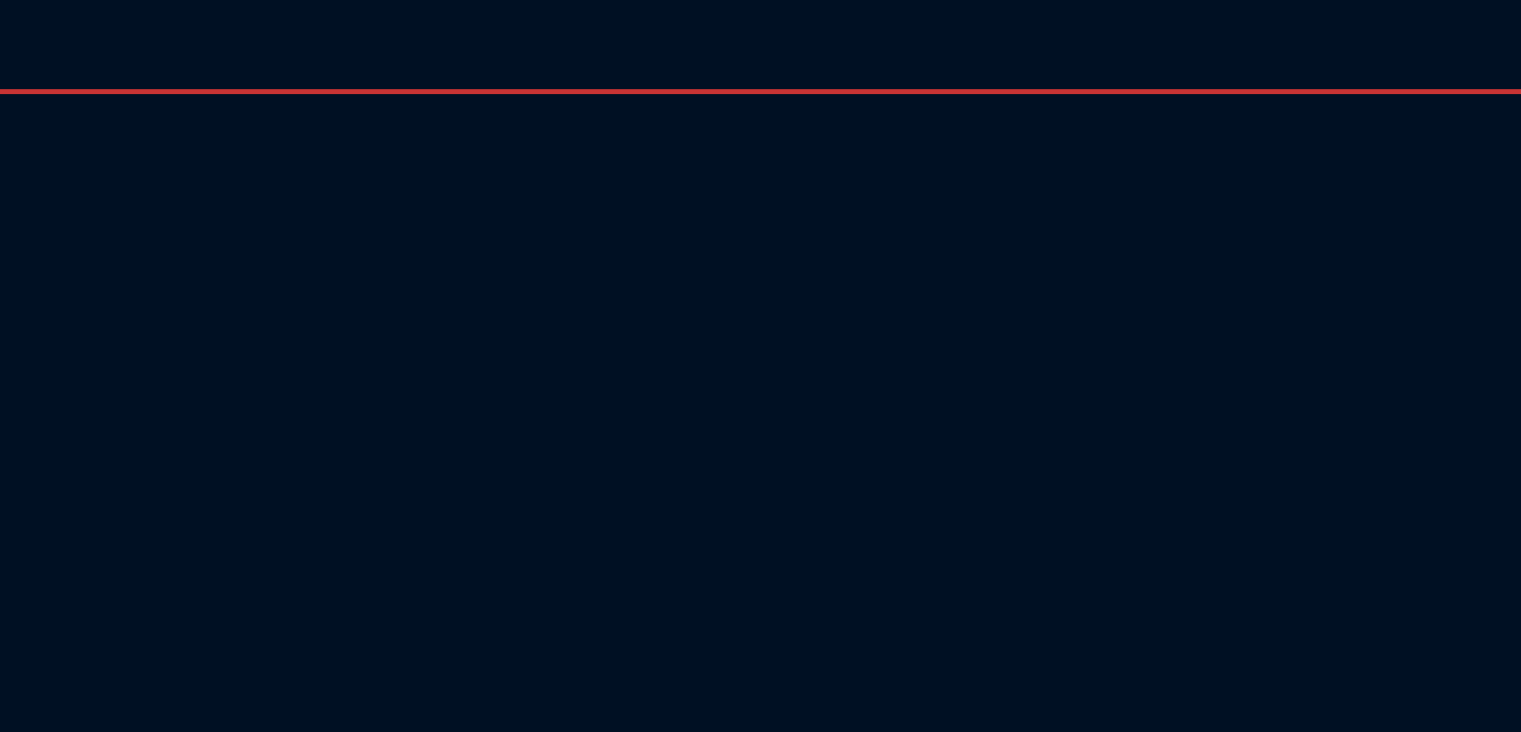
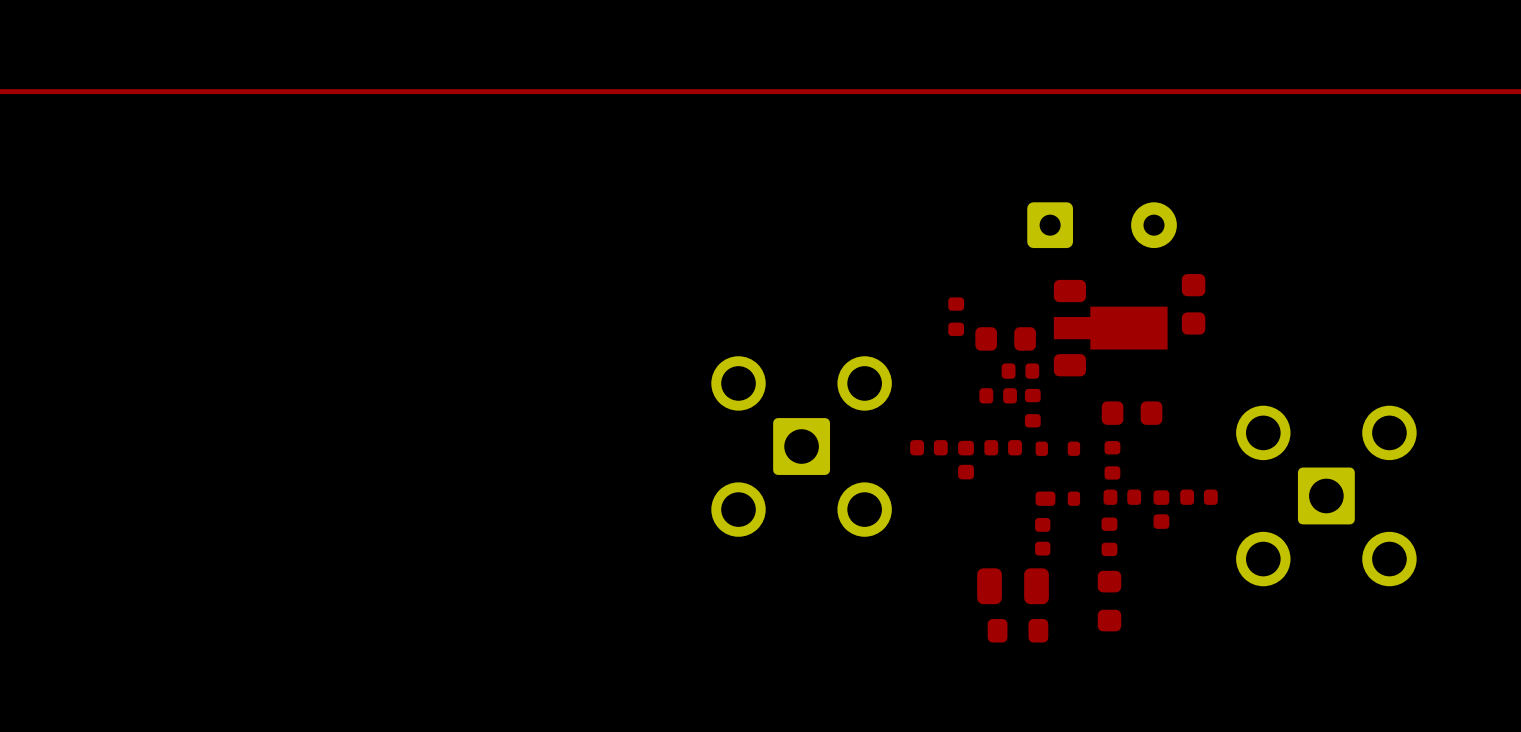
part: none -> (1102, 225)
part: none -> (1193, 304)
part: none -> (956, 316)
part: none -> (1110, 328)
part: none -> (1005, 338)
part: none -> (1020, 371)
part: none -> (998, 395)
part: none -> (1032, 408)
part: none -> (1132, 413)
part: none -> (801, 446)
part: none -> (928, 447)
part: none -> (1003, 447)
part: none -> (966, 460)
part: none -> (1112, 460)
part: none -> (1057, 473)
part: none -> (1326, 495)
part: none -> (1122, 497)
part: none -> (1199, 497)
part: none -> (1161, 509)
part: none -> (1042, 536)
part: none -> (1109, 536)
part: none -> (1013, 586)
part: none -> (1109, 601)
part: none -> (1017, 630)

